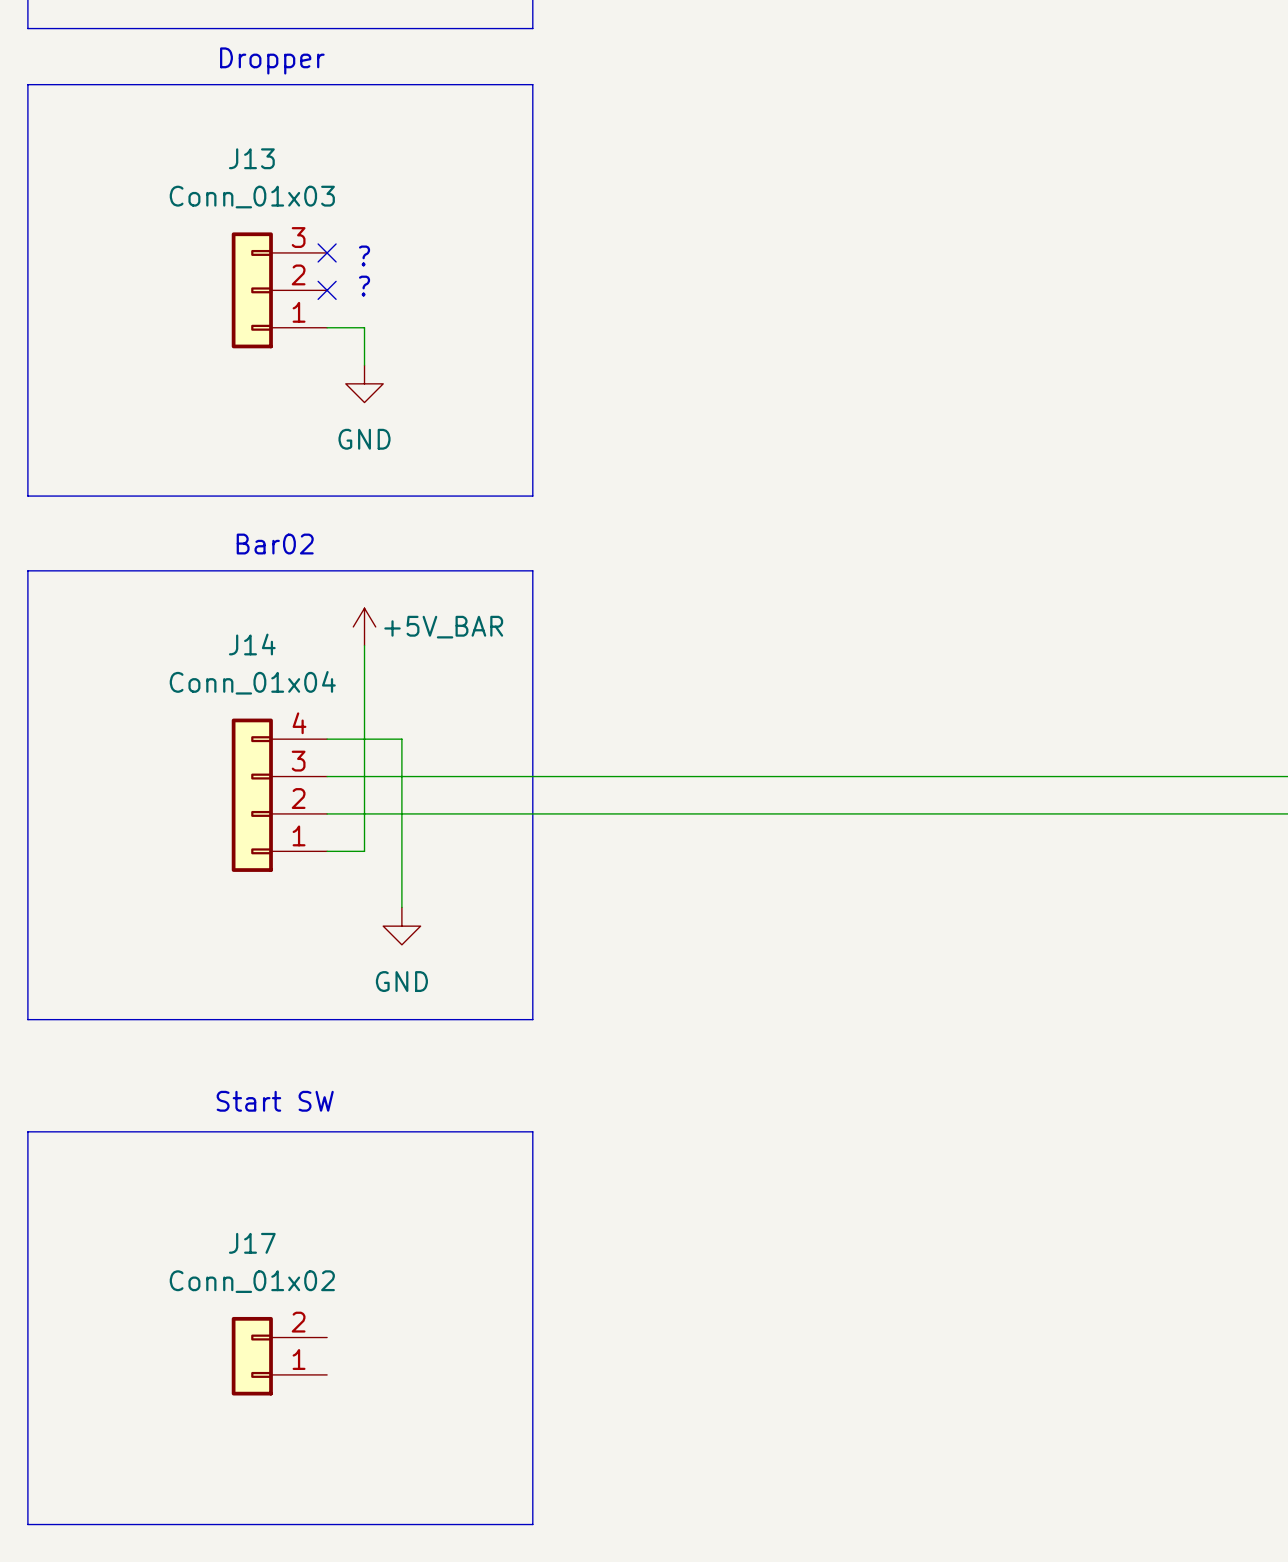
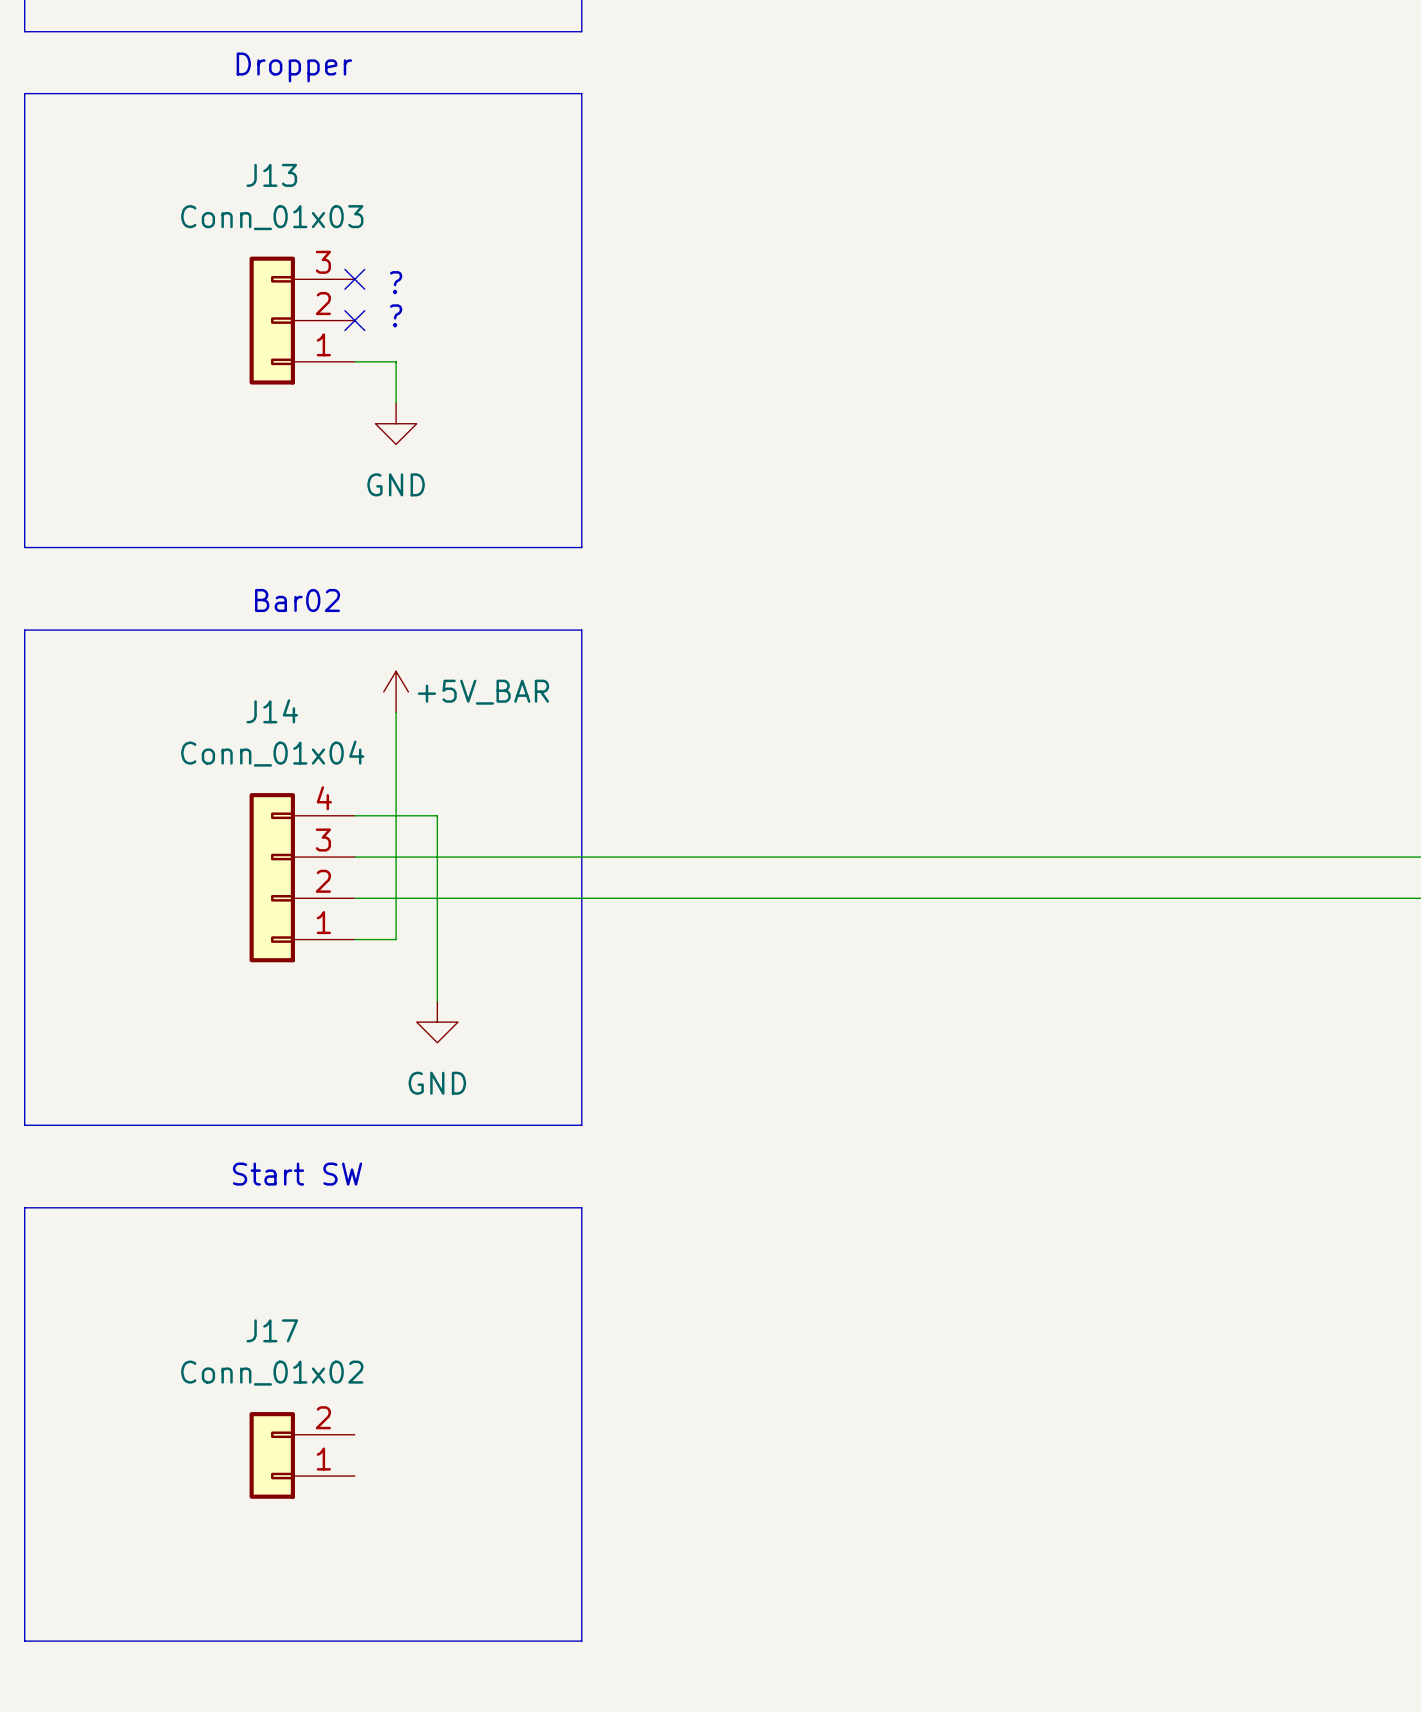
text position: Start SW (275, 1101) -> Start SW (297, 1174)
line: (27, 1131) (532, 1131) -> (24, 1249) (24, 1207) (581, 1207) (581, 1249)
J17 position: (279, 1356) -> (302, 1455)
line: (27, 1487) (27, 1524) (532, 1524) (532, 1487) -> (24, 1641) (581, 1641)

